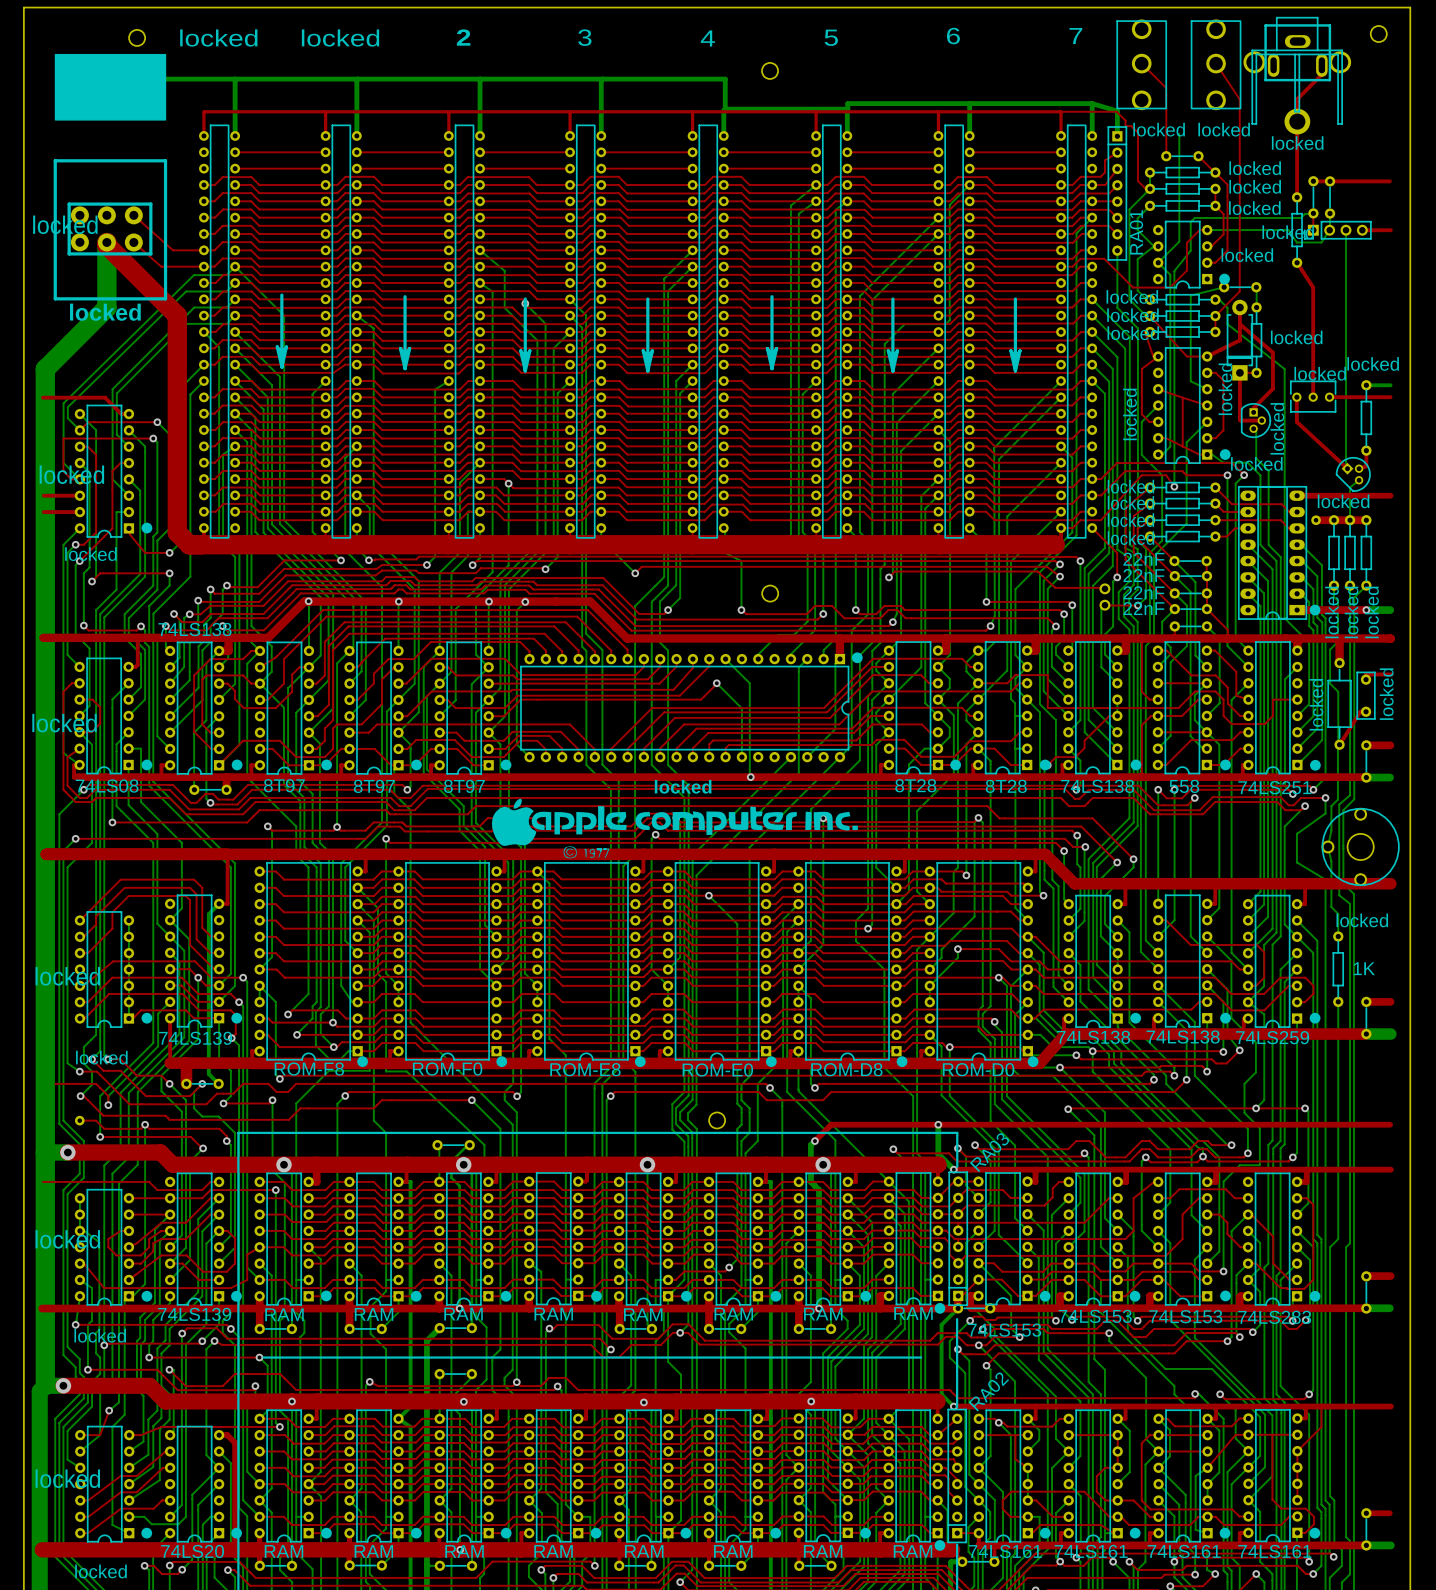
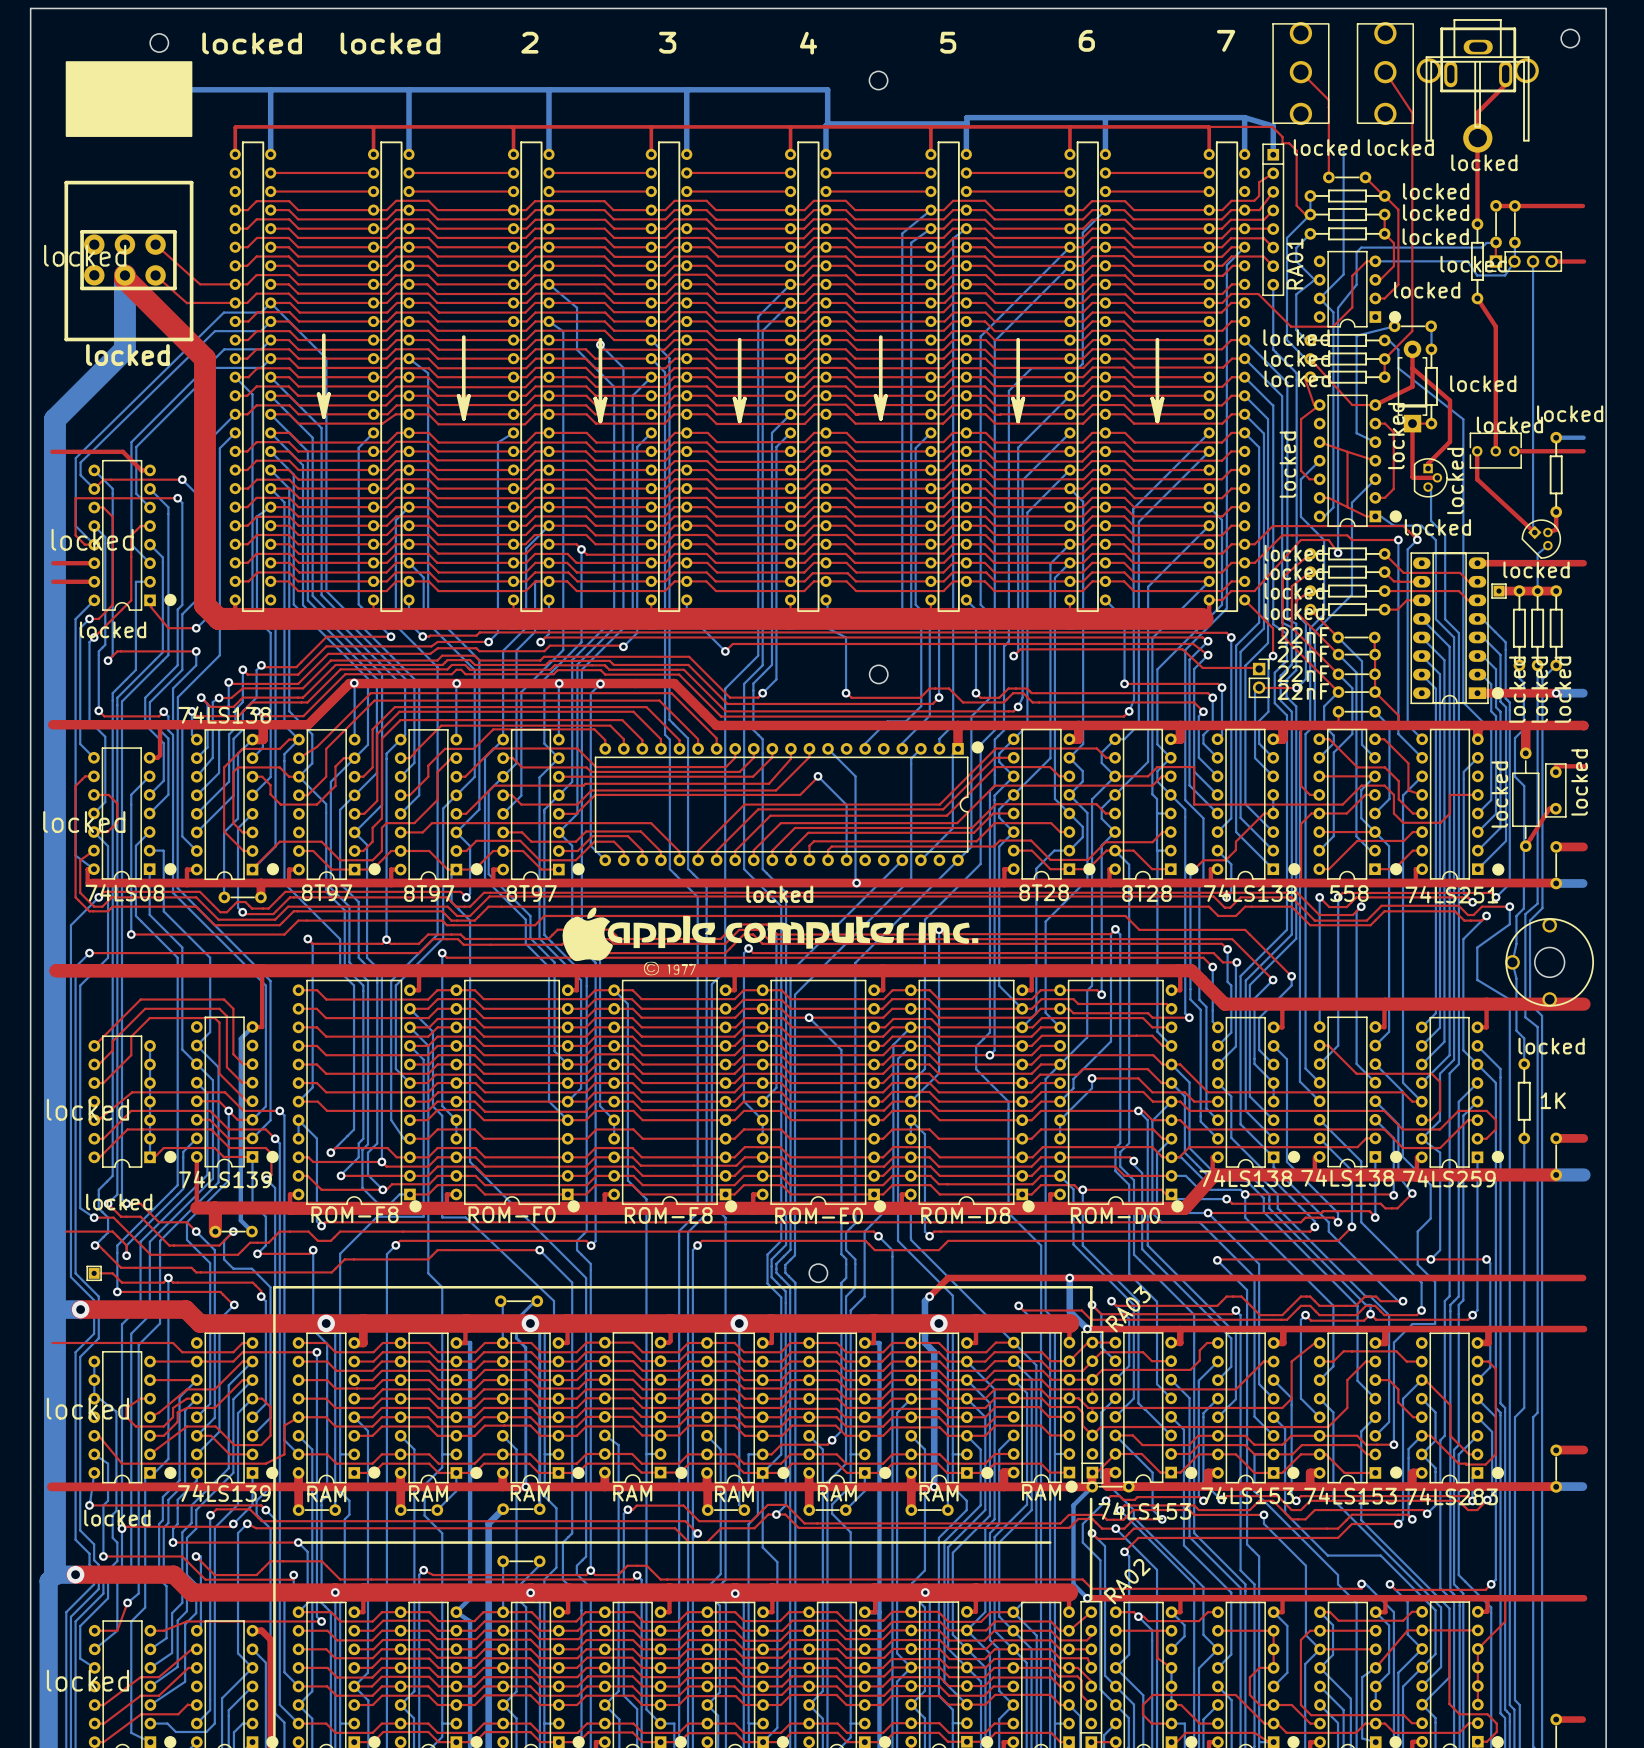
part footprint: [1311, 515, 1321, 526] -> [1491, 583, 1507, 599]
part footprint: [1099, 583, 1111, 611] -> [1248, 658, 1270, 698]
part footprint: [74, 1115, 85, 1126] -> [86, 1265, 102, 1281]

